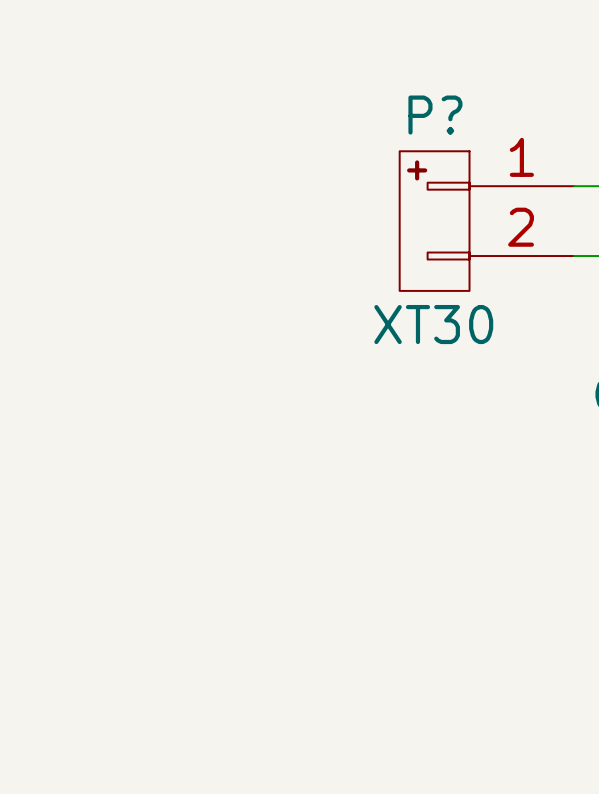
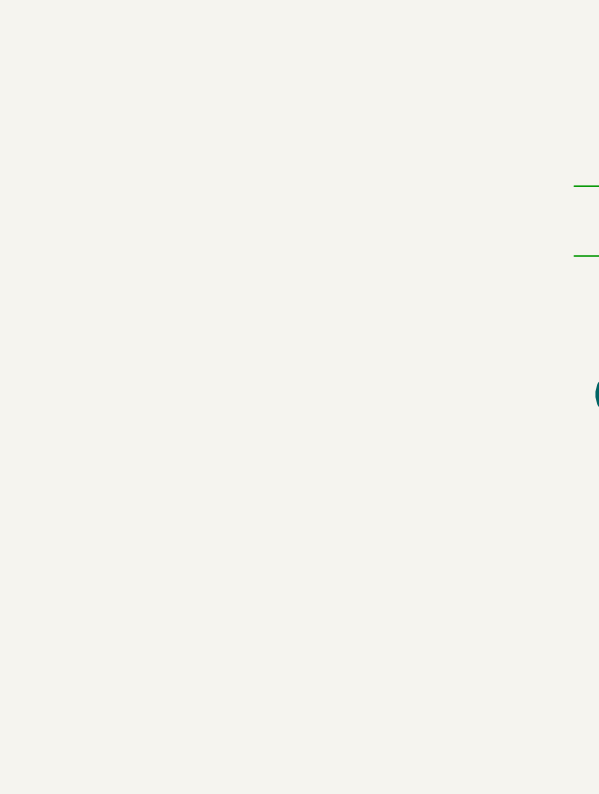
P?: XT30 (486, 221) -> none

